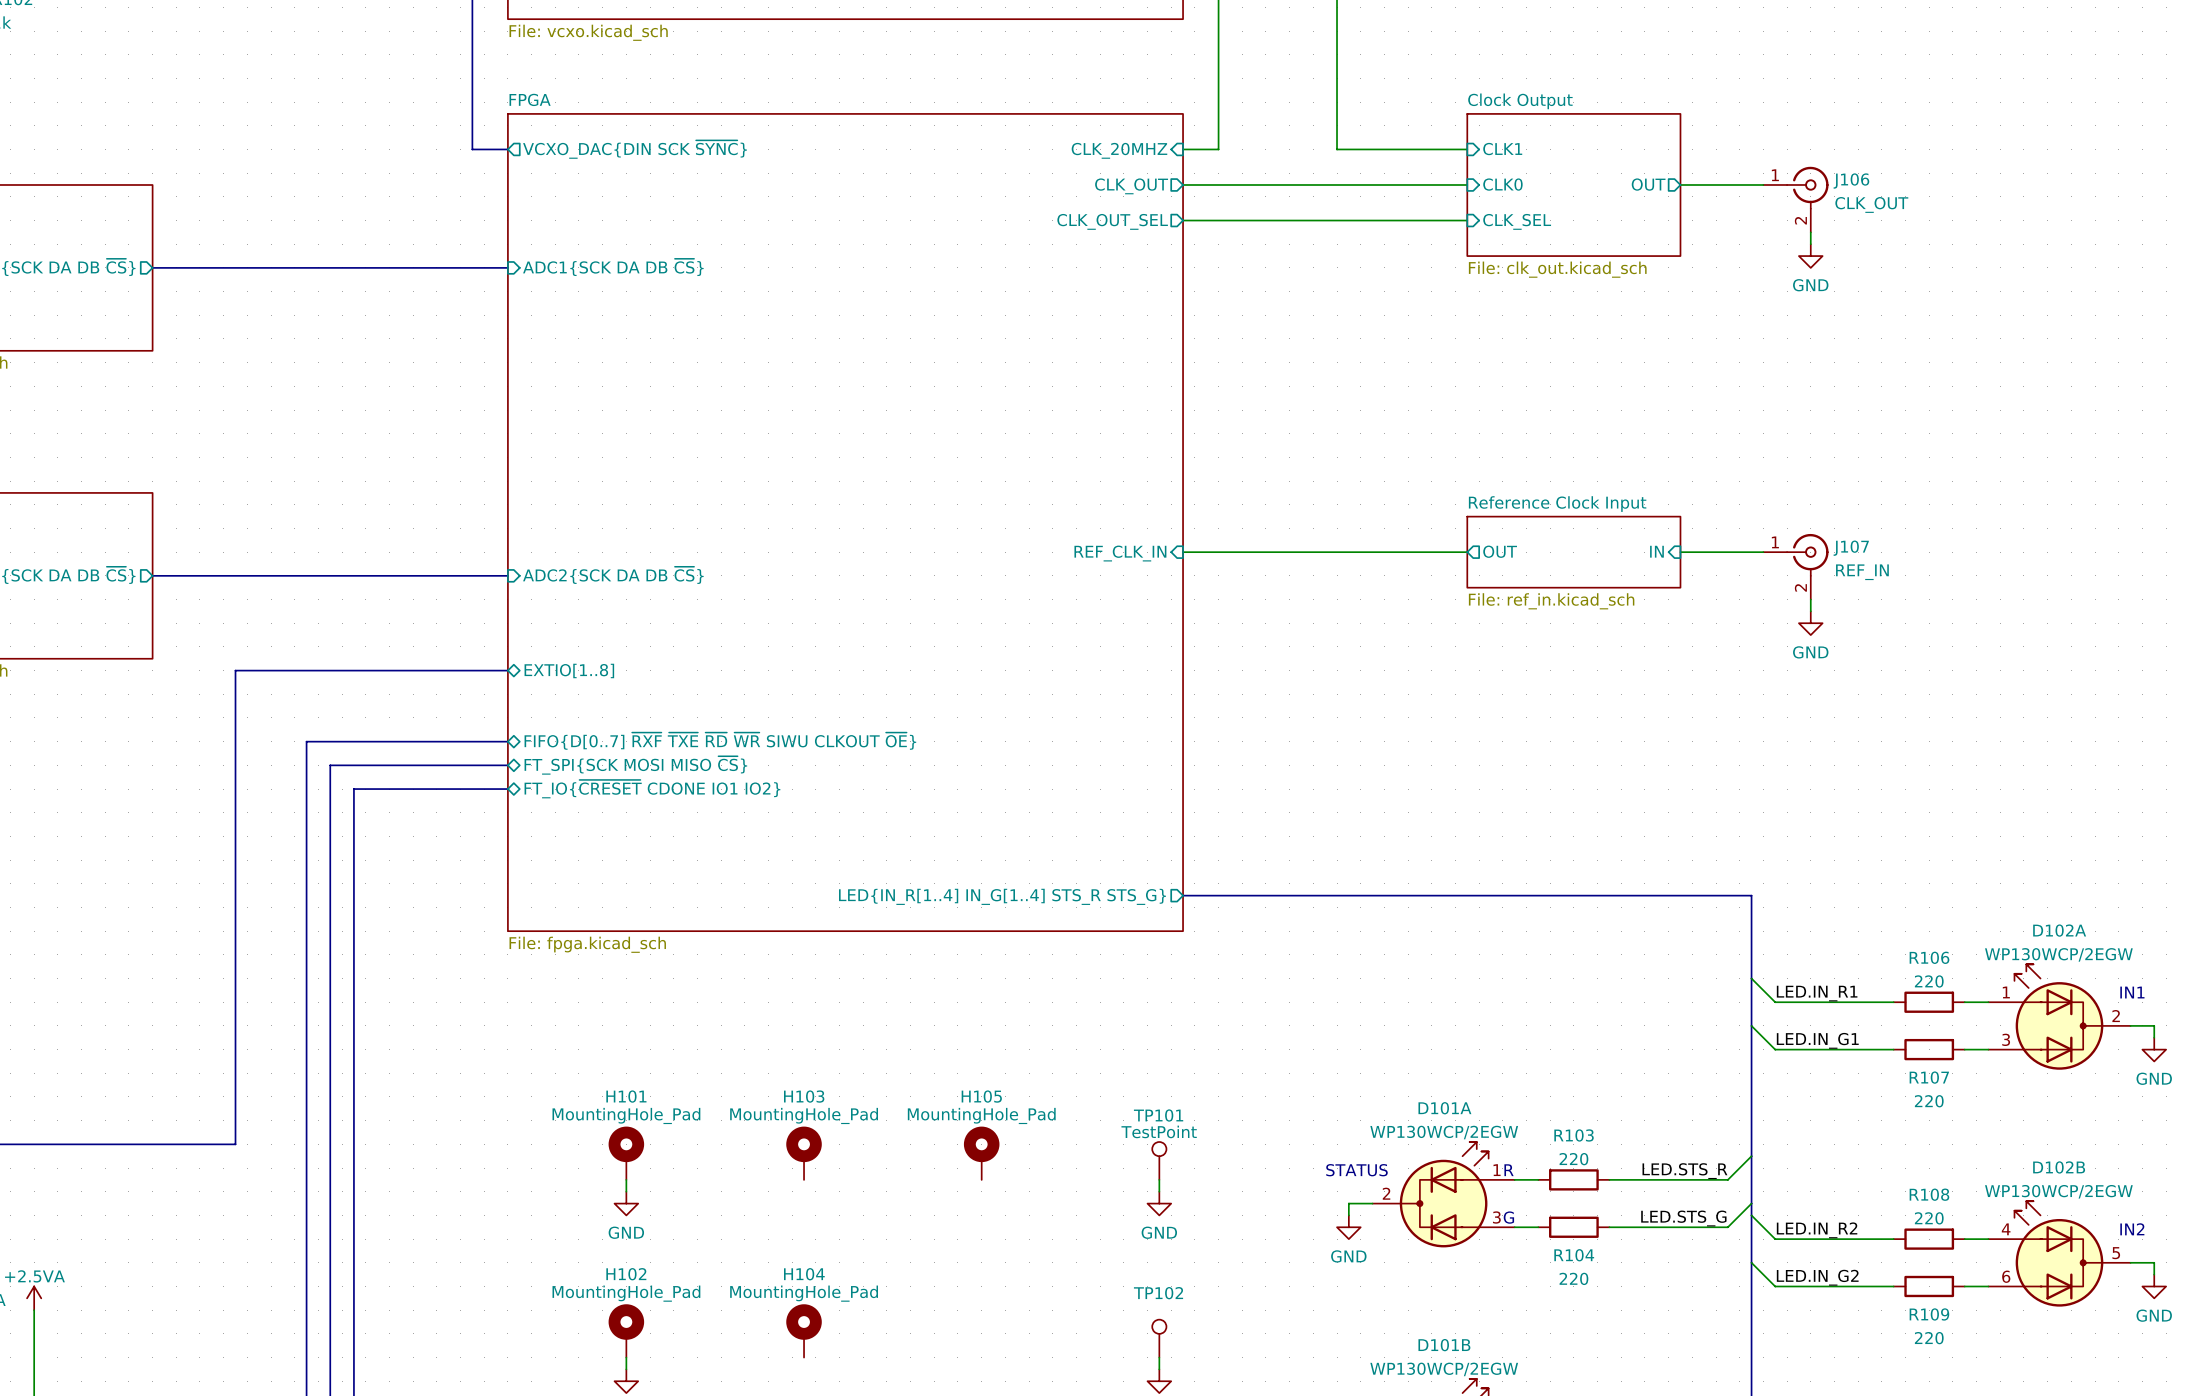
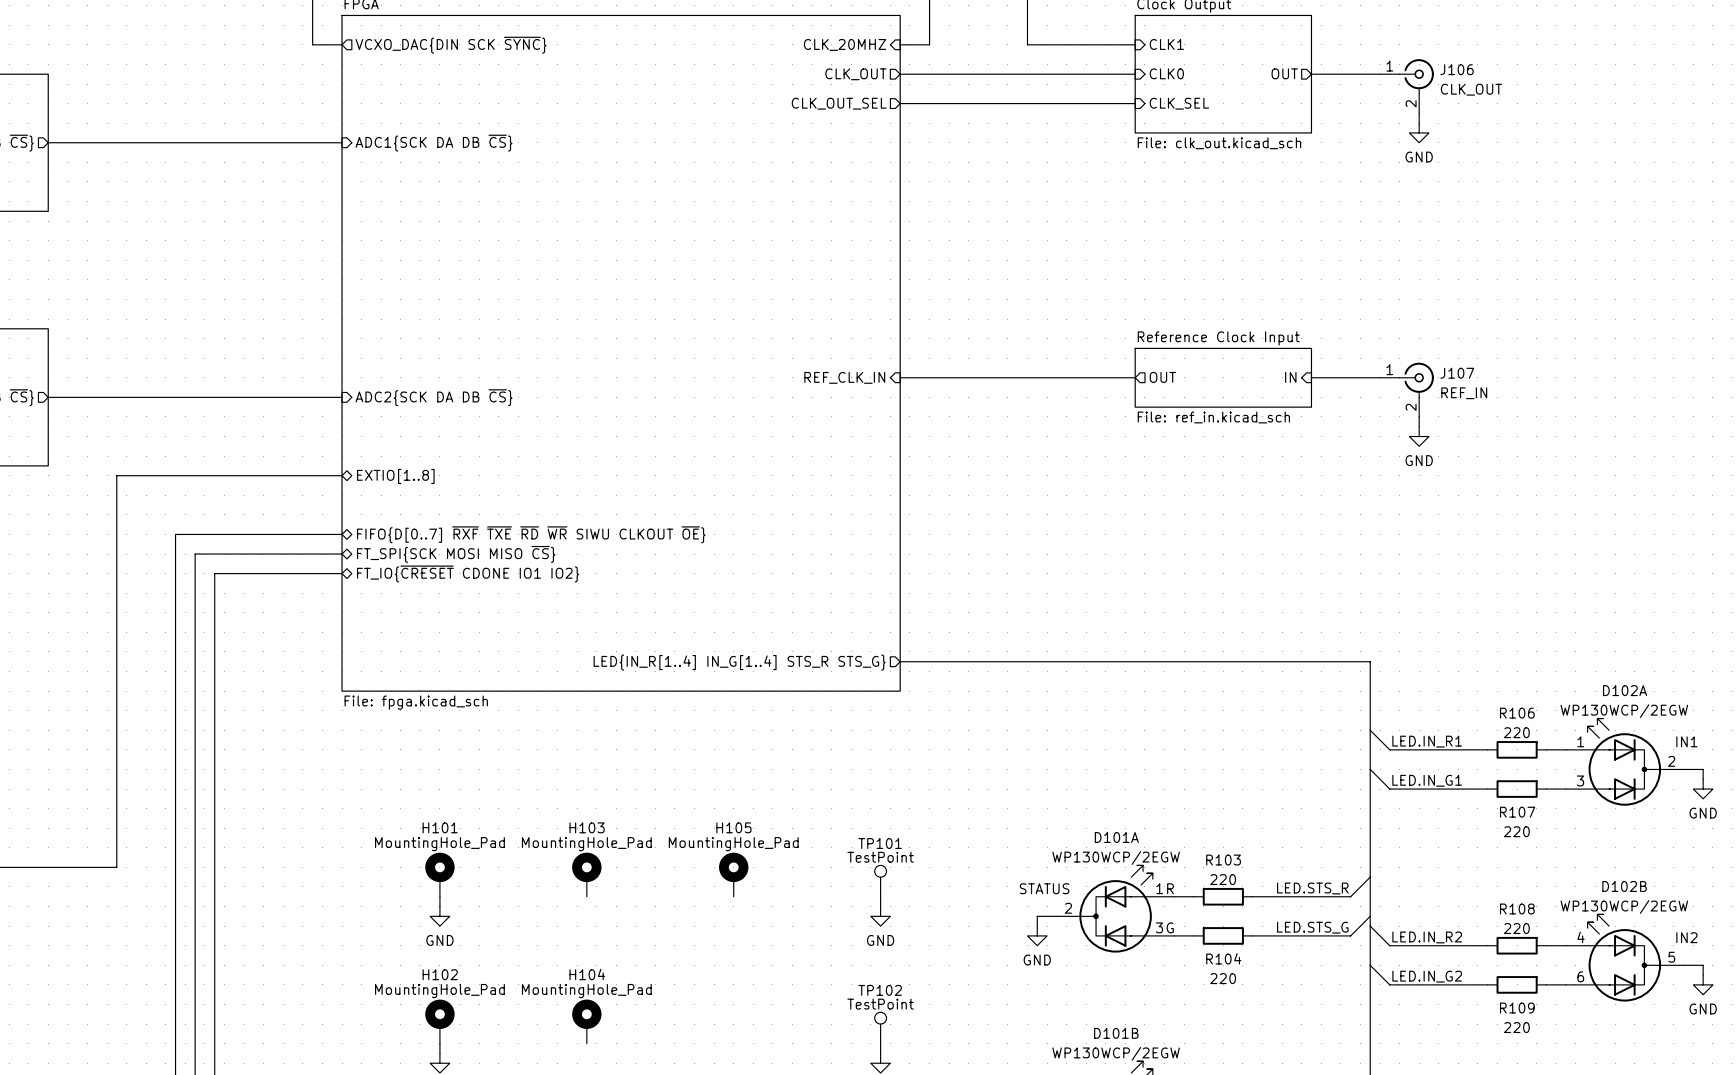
TP102 value: none -> TestPoint (880, 1004)

